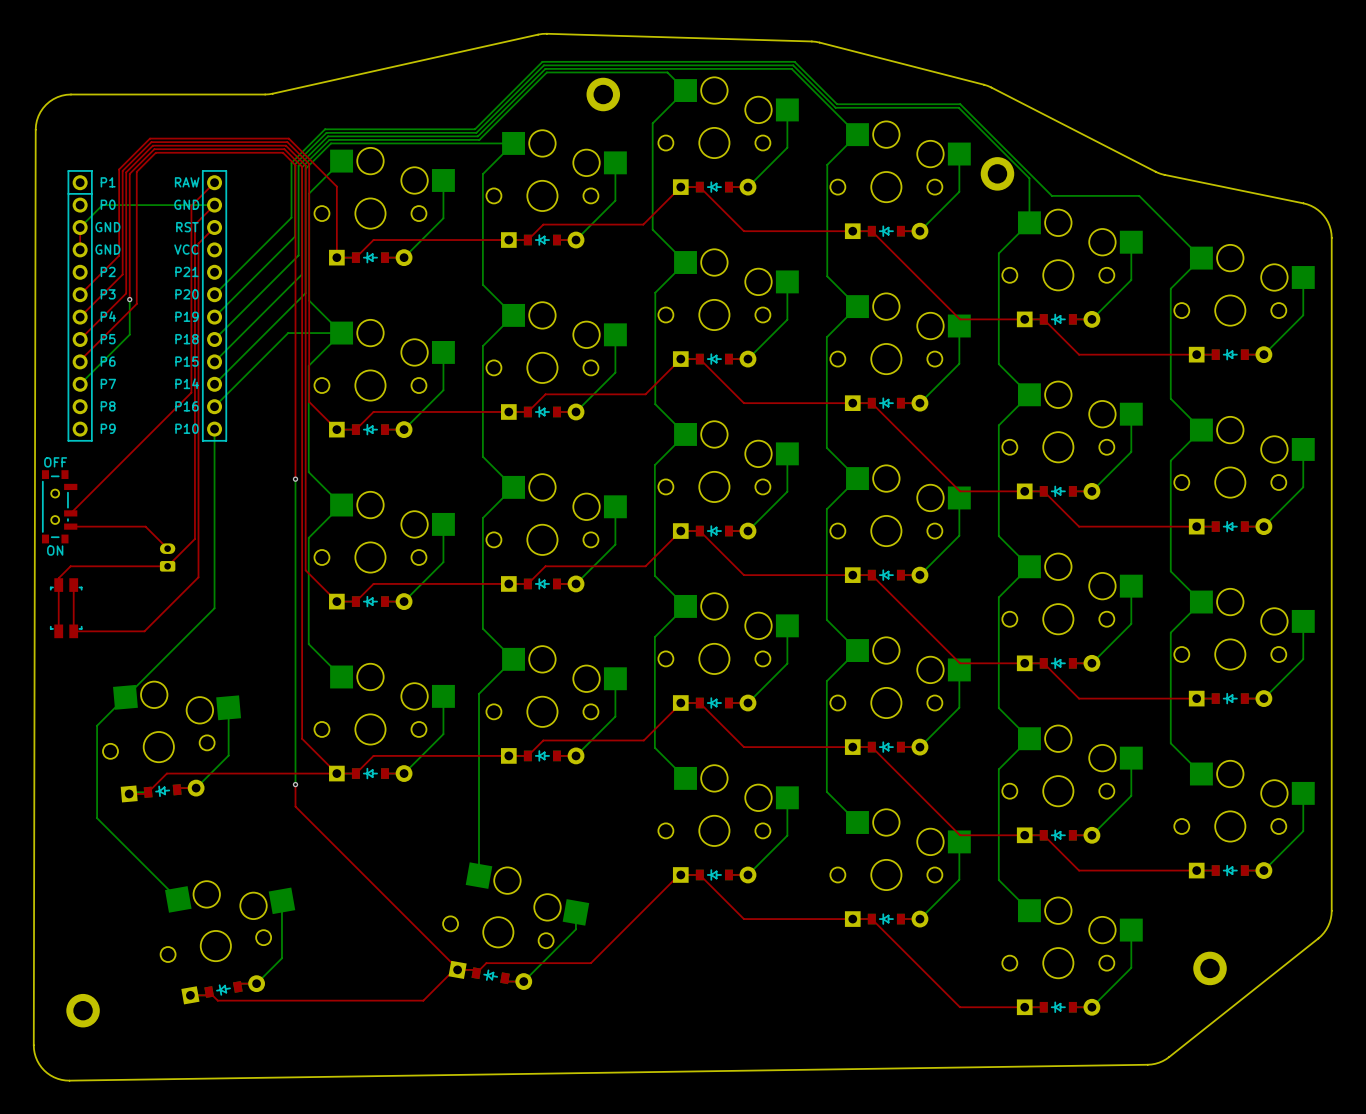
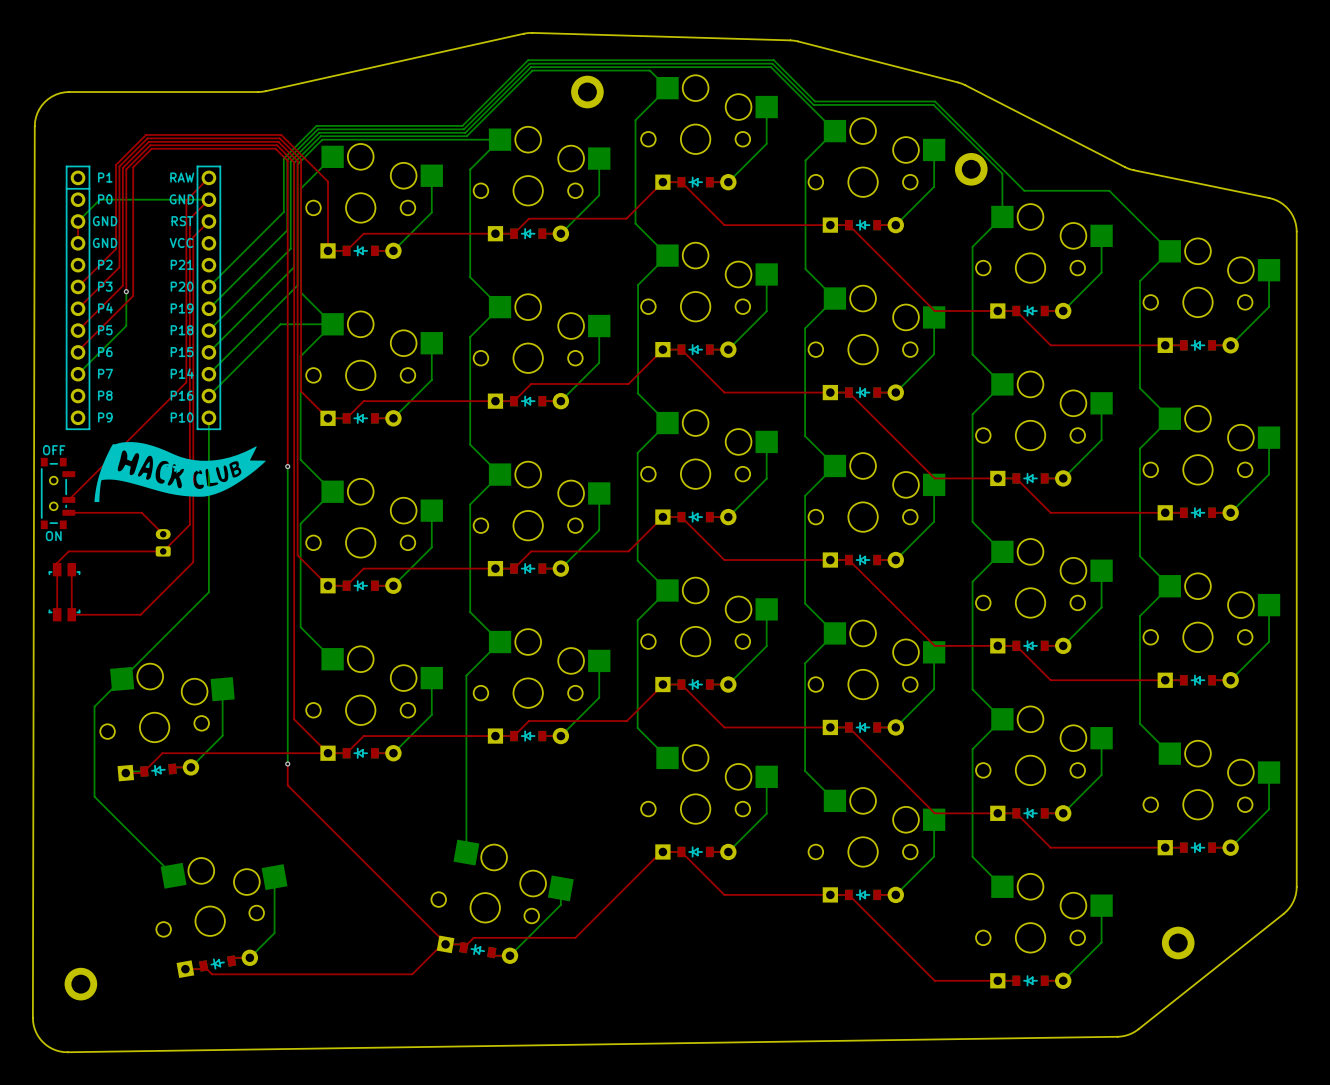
part: none -> (180, 472)

